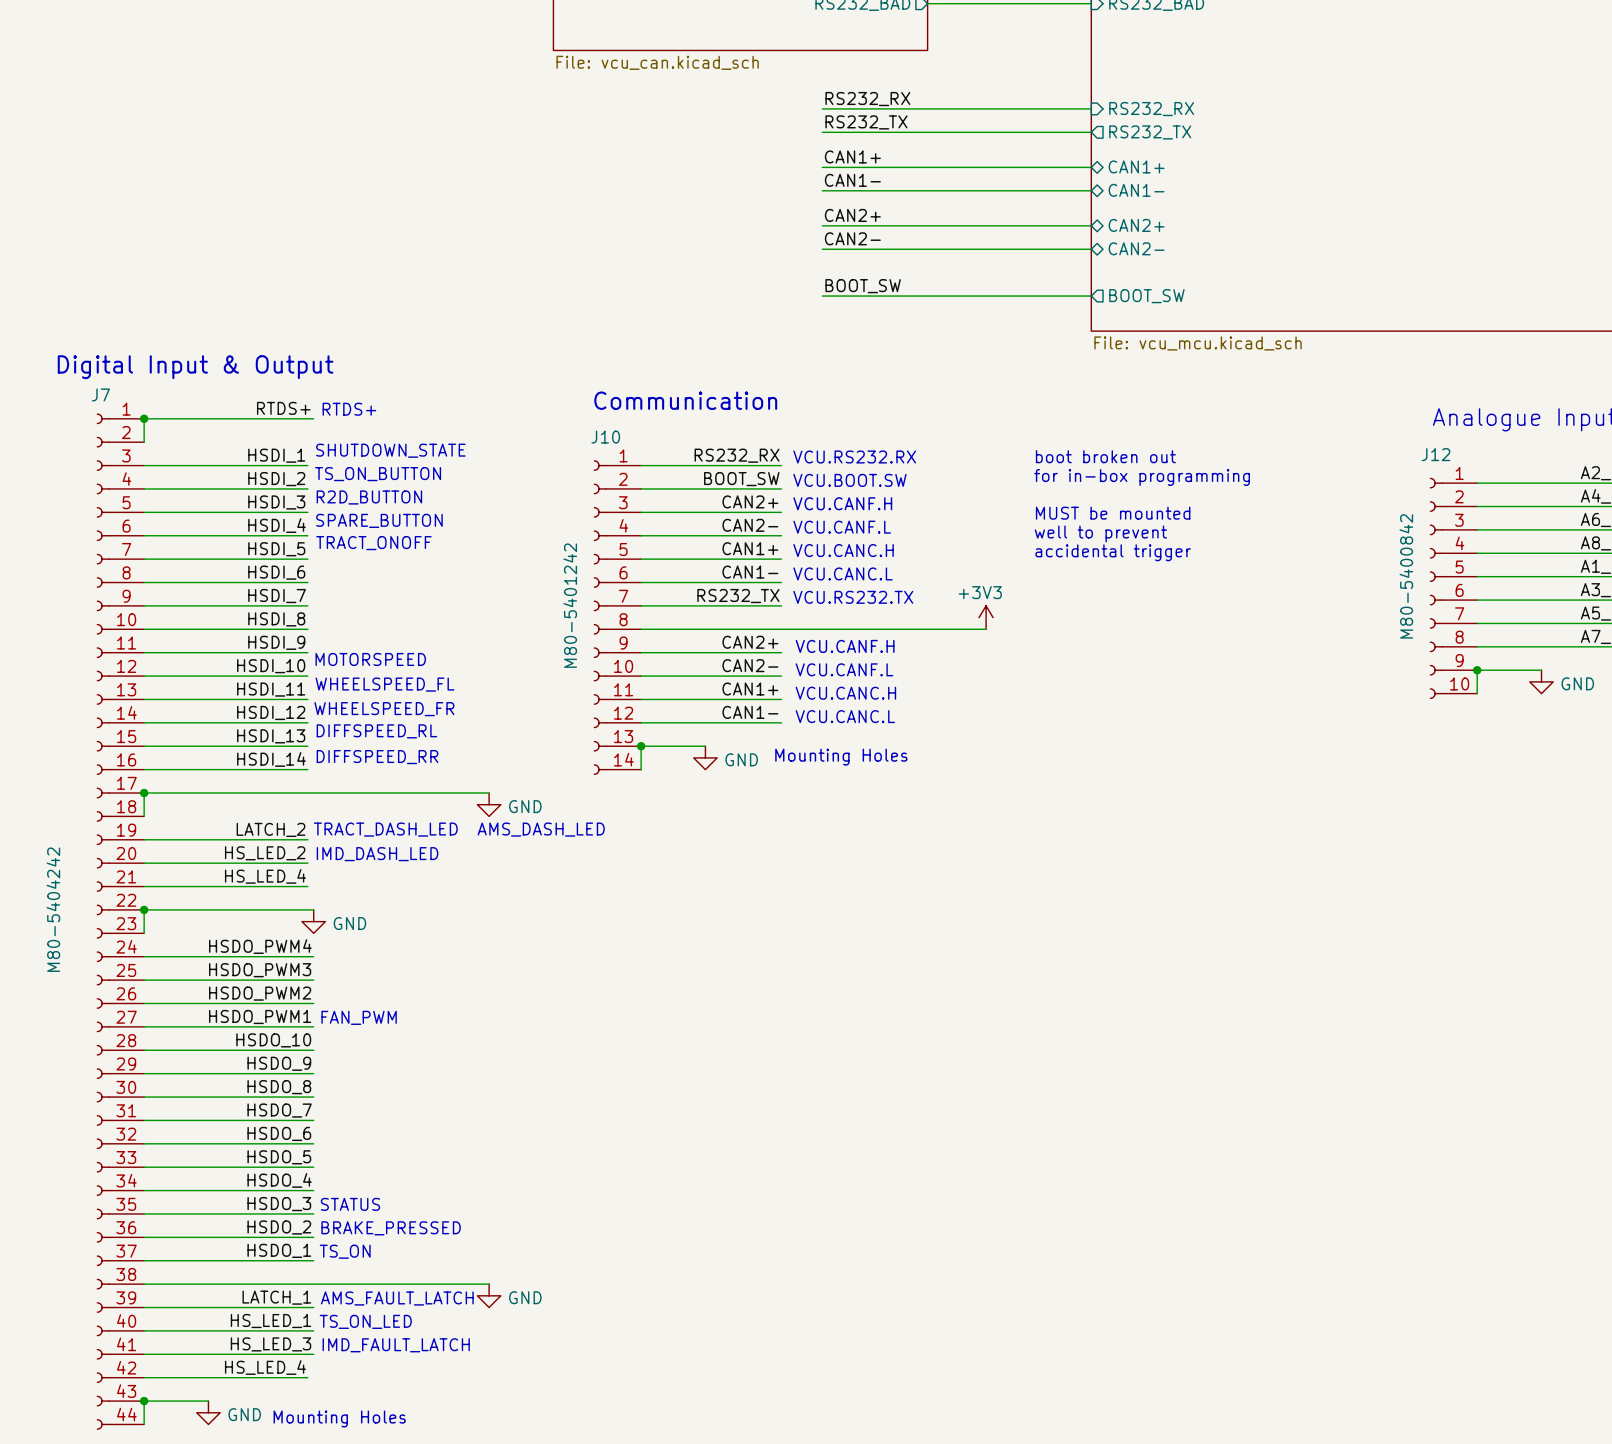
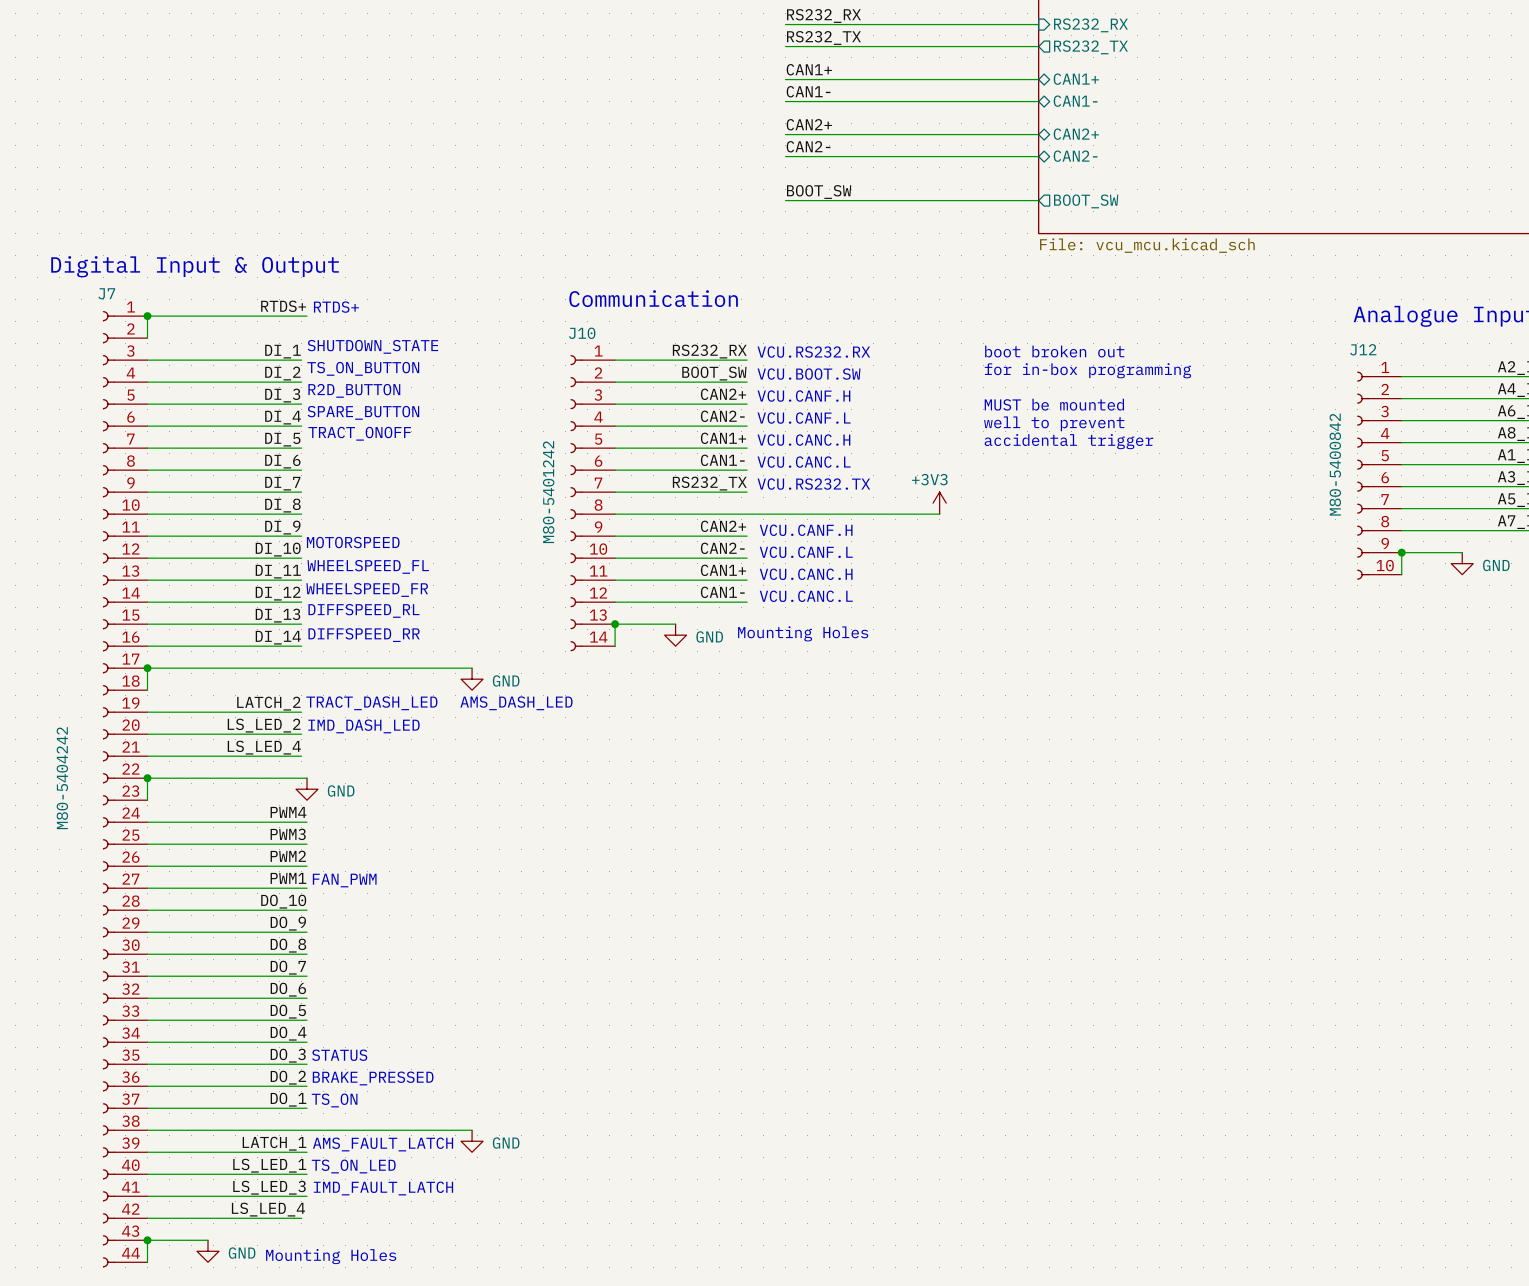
label: HSDI_1 (276, 455) -> DI_1 (282, 351)
label: HSDI_2 (276, 479) -> DI_2 (282, 373)
label: HSDI_3 (276, 502) -> DI_3 (282, 395)
label: HSDI_4 (277, 525) -> DI_4 (283, 417)
label: HSDI_5 (276, 549) -> DI_5 (282, 439)
label: HSDI_6 (276, 572) -> DI_6 (282, 461)
label: HSDI_7 (277, 596) -> DI_7 (282, 483)
label: HSDI_8 (276, 619) -> DI_8 (282, 505)
label: HSDI_9 (276, 642) -> DI_9 (282, 527)
label: HSDI_10 (271, 666) -> DI_10 (278, 549)
label: HSDI_11 (271, 689) -> DI_11 (278, 571)
label: HSDI_12 (271, 712) -> DI_12 (278, 593)
label: HSDI_13 (271, 736) -> DI_13 (277, 615)
label: HSDI_14 (271, 759) -> DI_14 (278, 637)
label: HS_LED_2 (265, 853) -> LS_LED_2 (264, 725)
label: HS_LED_4 (265, 876) -> LS_LED_4 (264, 747)
label: HSDO_PWM4 (260, 946) -> PWM4 (288, 812)
label: HSDO_PWM3 (260, 970) -> PWM3 (288, 834)
label: HSDO_PWM2 (260, 993) -> PWM2 (288, 856)
label: HSDO_PWM1 (260, 1017) -> PWM1 (288, 878)
label: HSDO_10 (273, 1040) -> DO_10 (283, 901)
label: HSDO_9 (279, 1063) -> DO_9 (288, 923)
label: HSDO_8 (279, 1087) -> DO_8 (288, 945)
label: HSDO_7 (279, 1110) -> DO_7 (288, 967)
label: HSDO_6 (279, 1133) -> DO_6 (288, 989)
label: HSDO_5 (279, 1157) -> DO_5 (288, 1011)
label: HSDO_4 (279, 1180) -> DO_4 (288, 1033)
label: HSDO_3 (279, 1204) -> DO_3 (288, 1055)
label: HSDO_2 (279, 1227) -> DO_2 (288, 1077)
label: HSDO_1 (279, 1250) -> DO_1 (288, 1099)
label: HS_LED_1 (271, 1321) -> LS_LED_1 (269, 1165)
label: HS_LED_3 (271, 1344) -> LS_LED_3 (269, 1187)
label: HS_LED_4 (265, 1367) -> LS_LED_4 (268, 1209)

